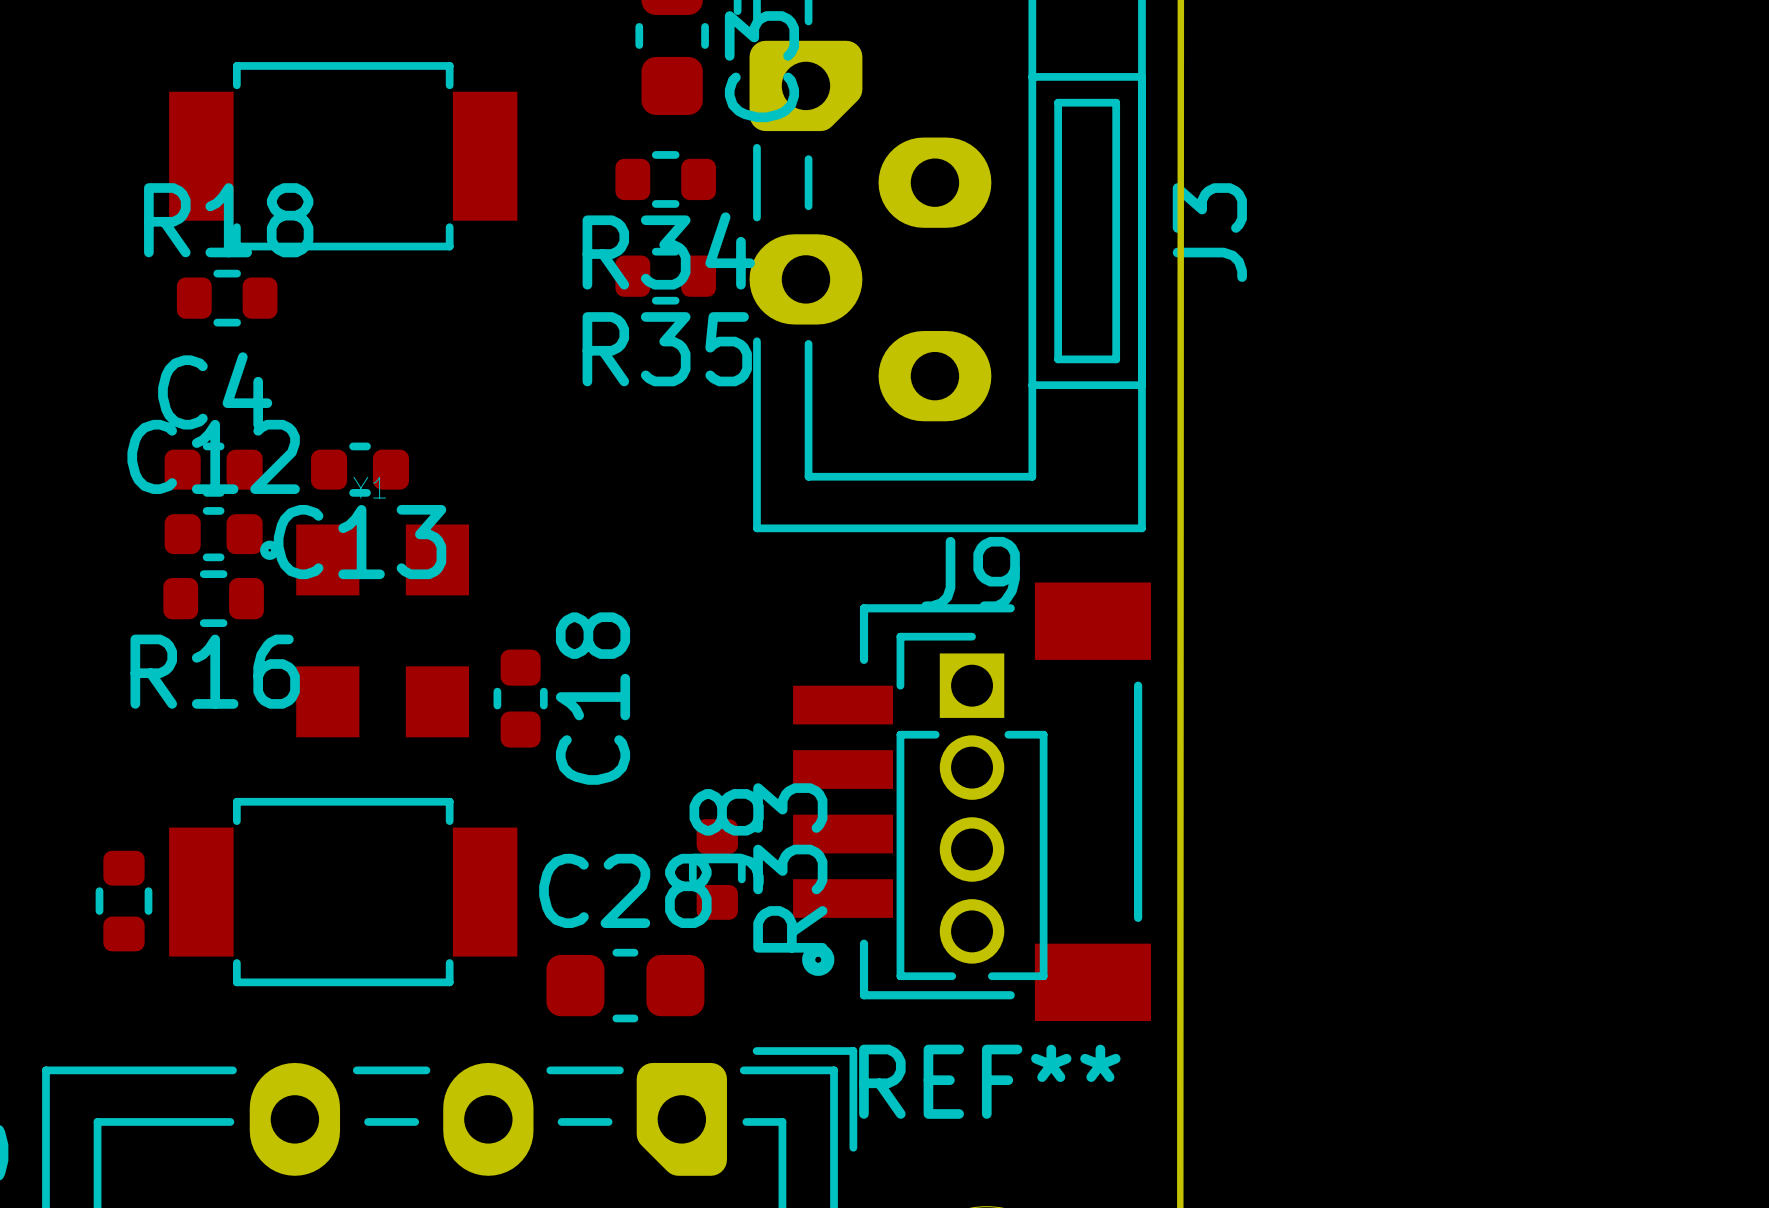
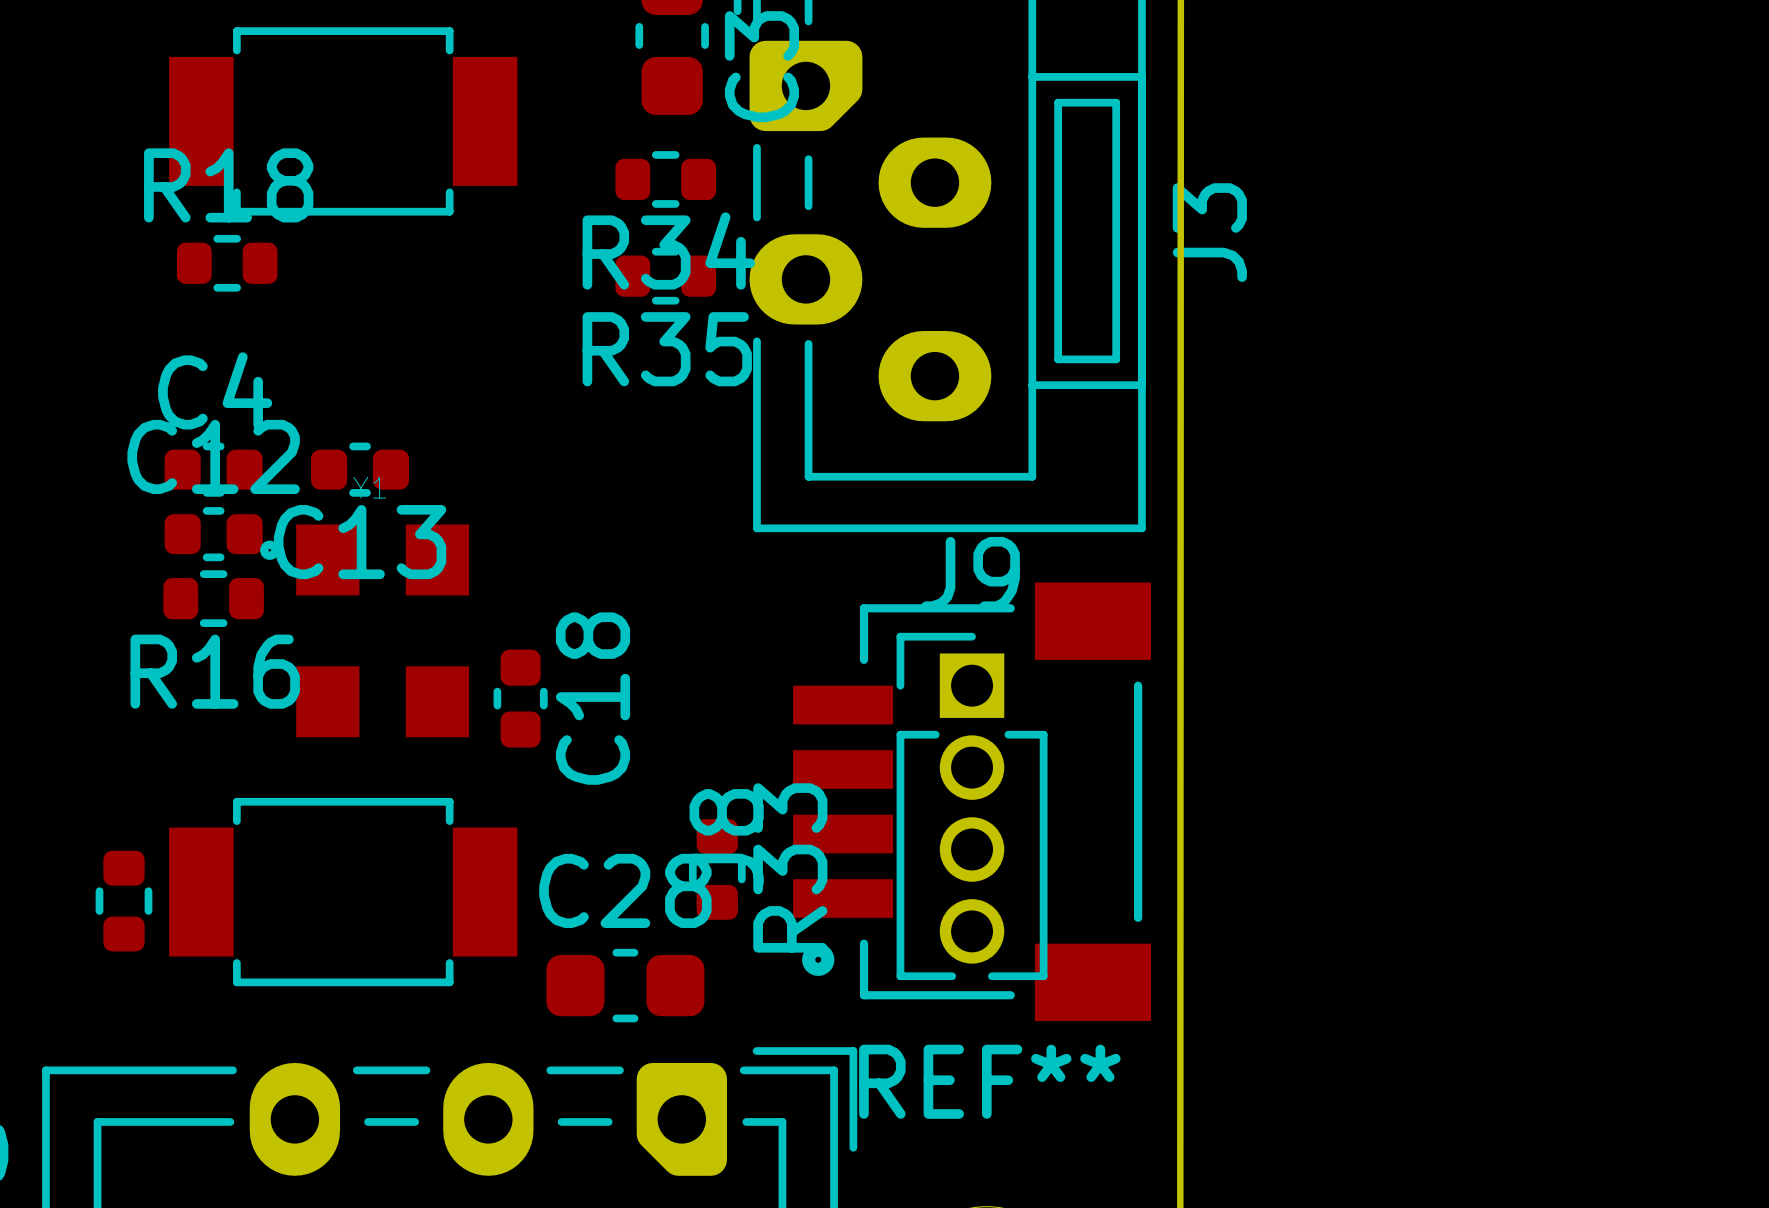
part position: (343, 156) -> (343, 121)
R18 position: (227, 298) -> (227, 263)

